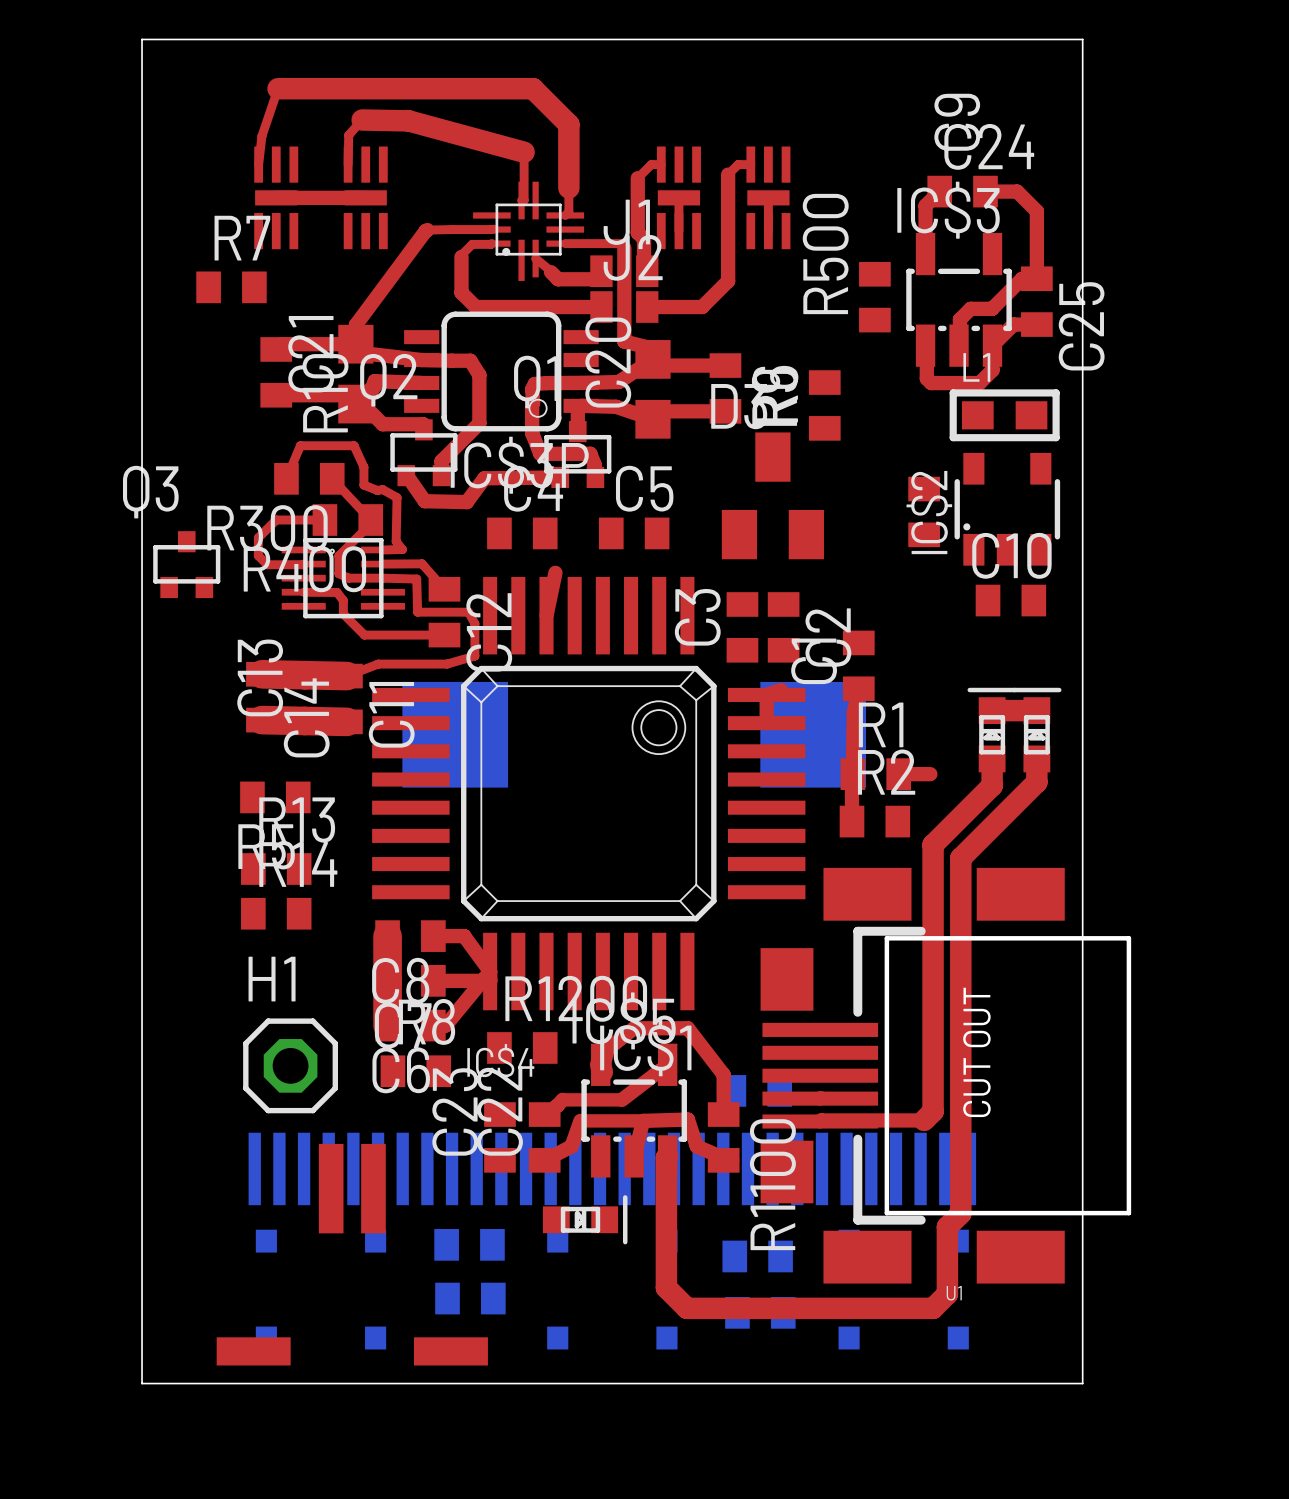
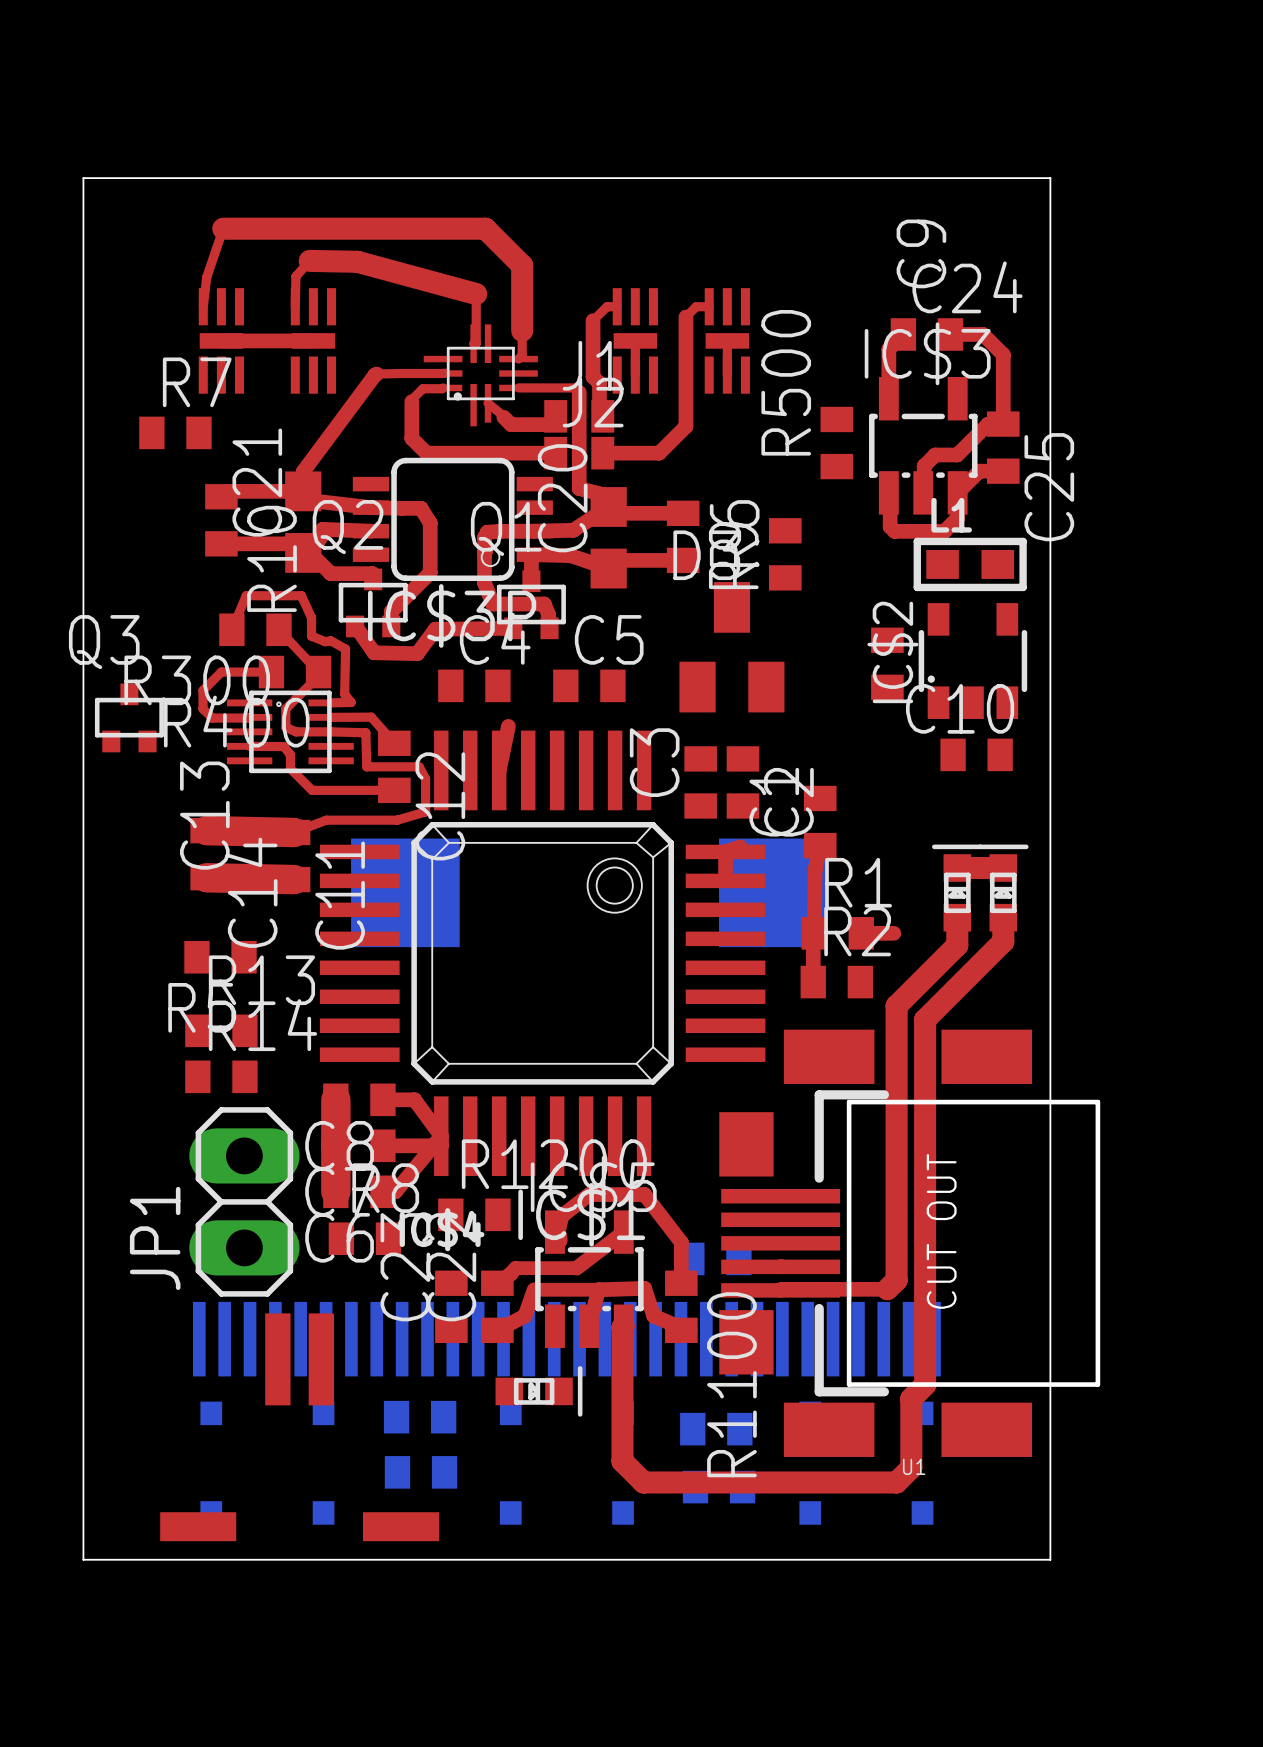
JP1: none -> (244, 1201)
H1: (290, 1065) -> none

